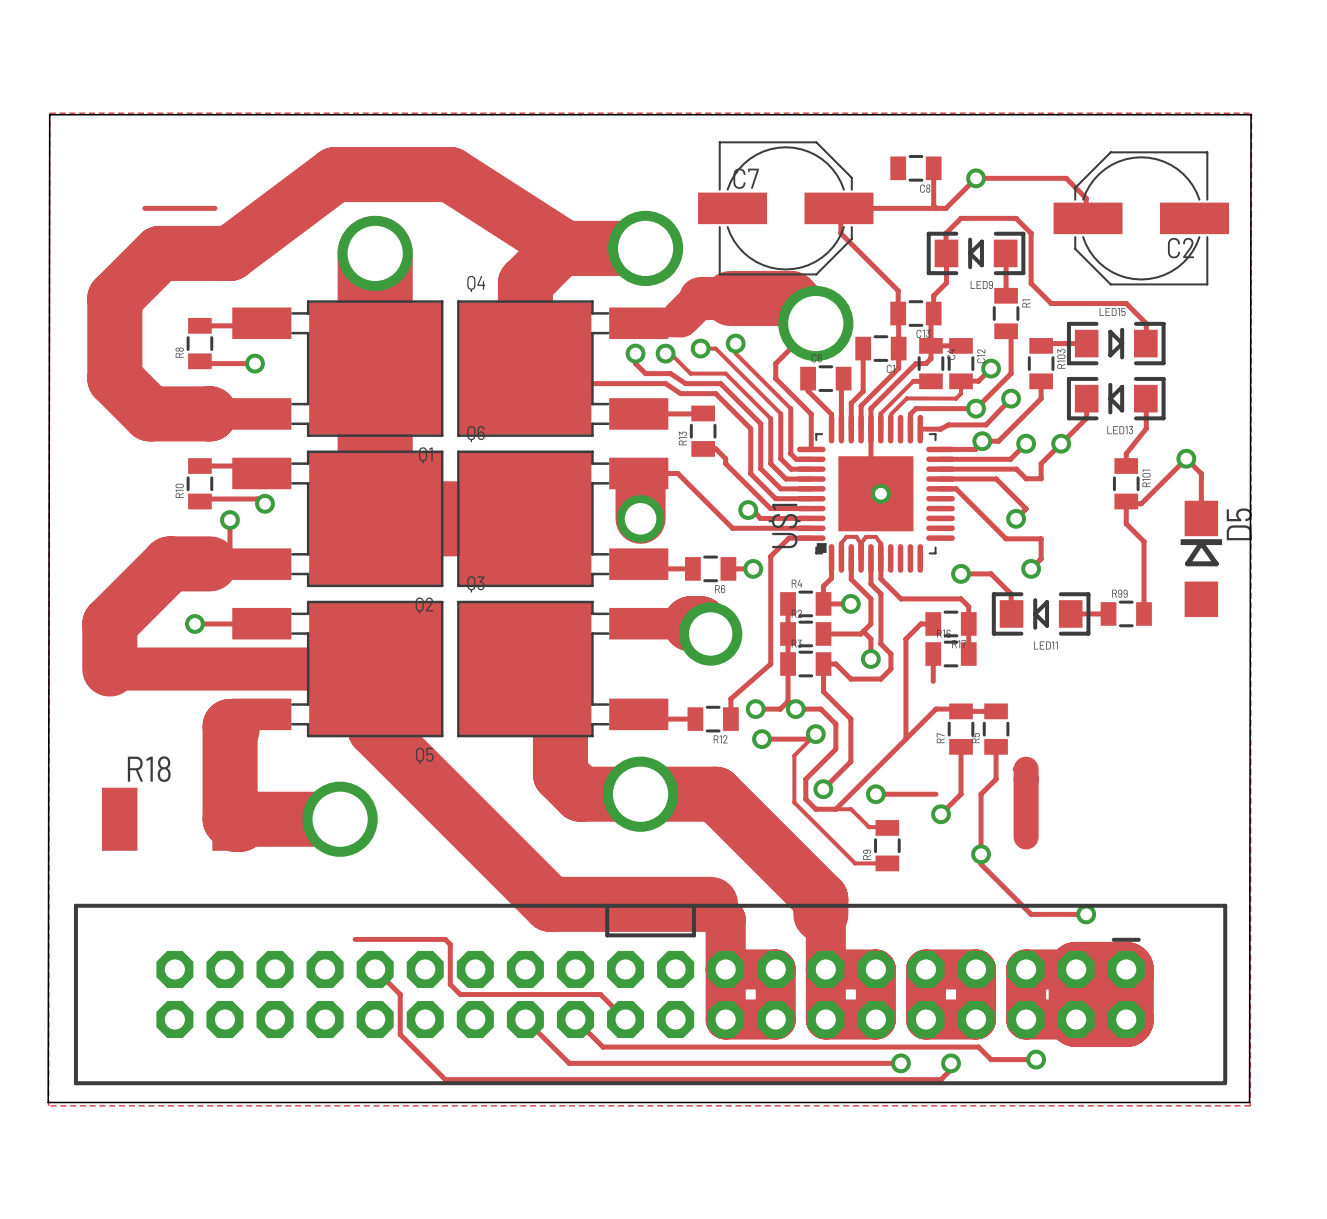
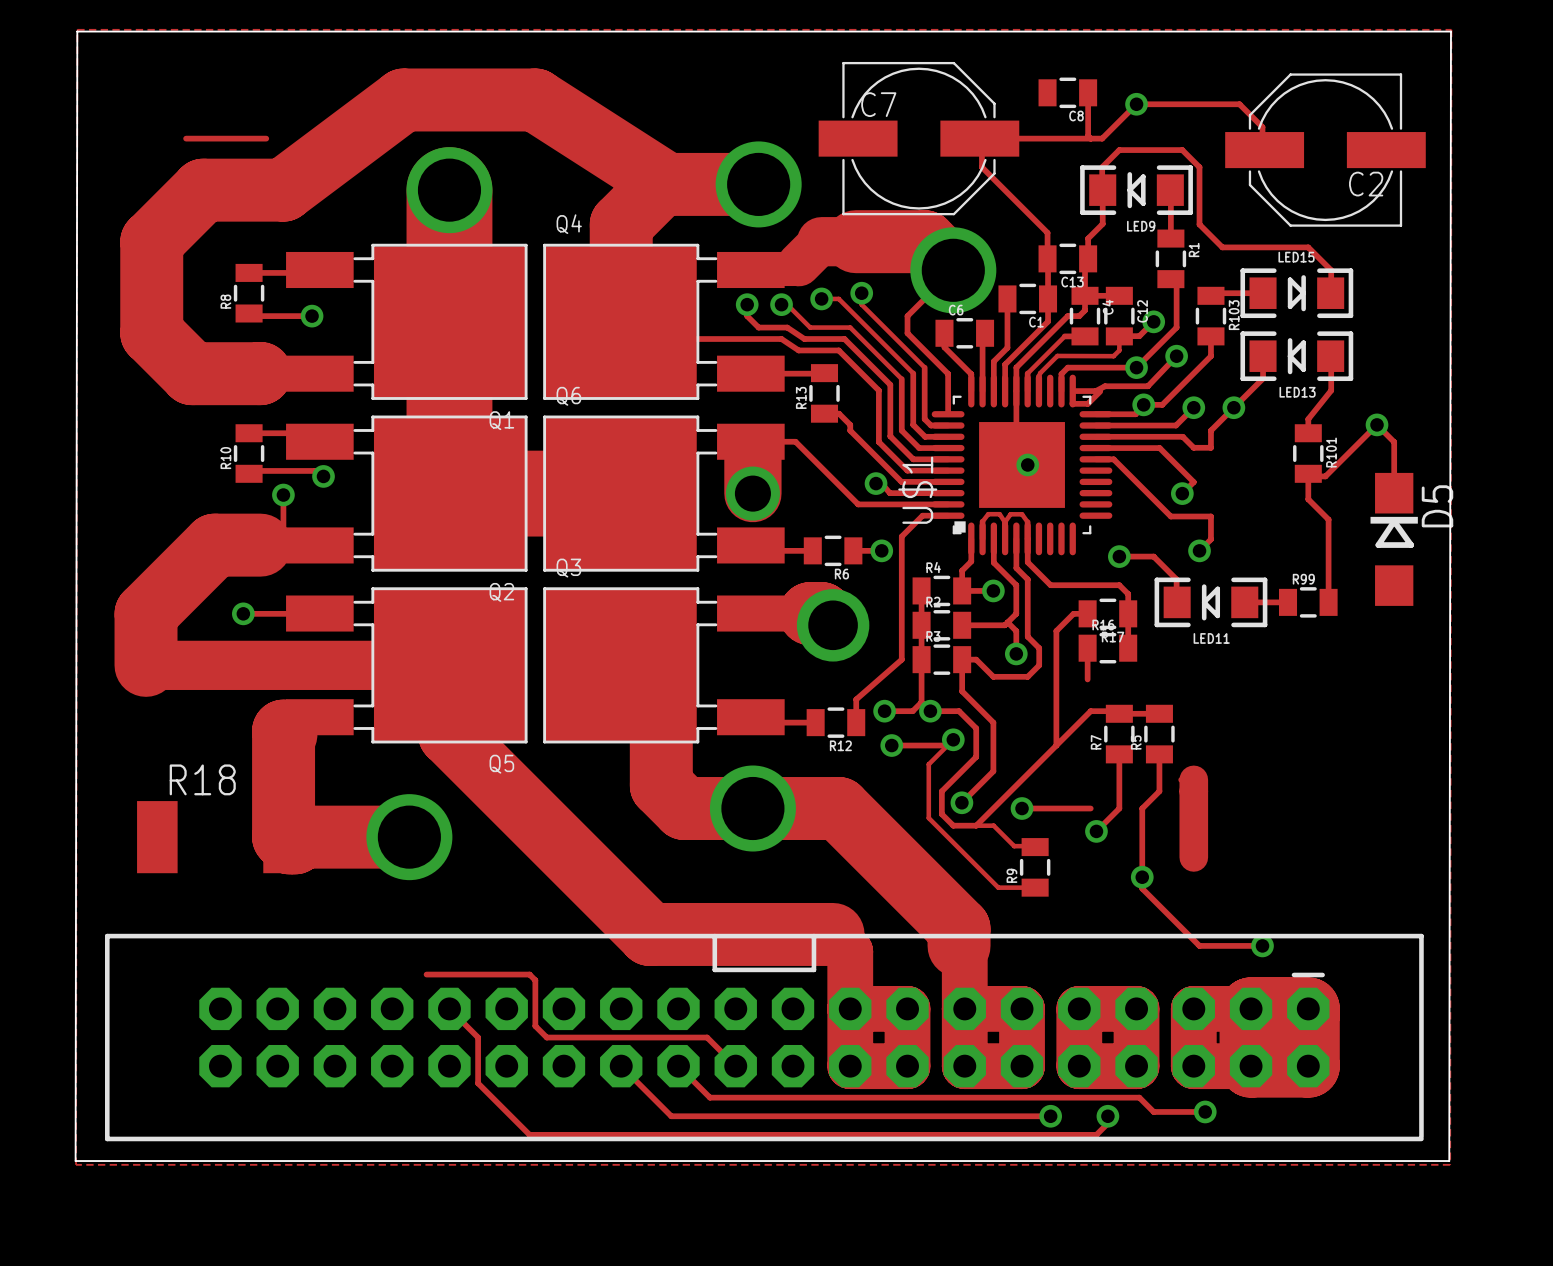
track: none -> (1100, 391) (1087, 403) (1072, 403)

